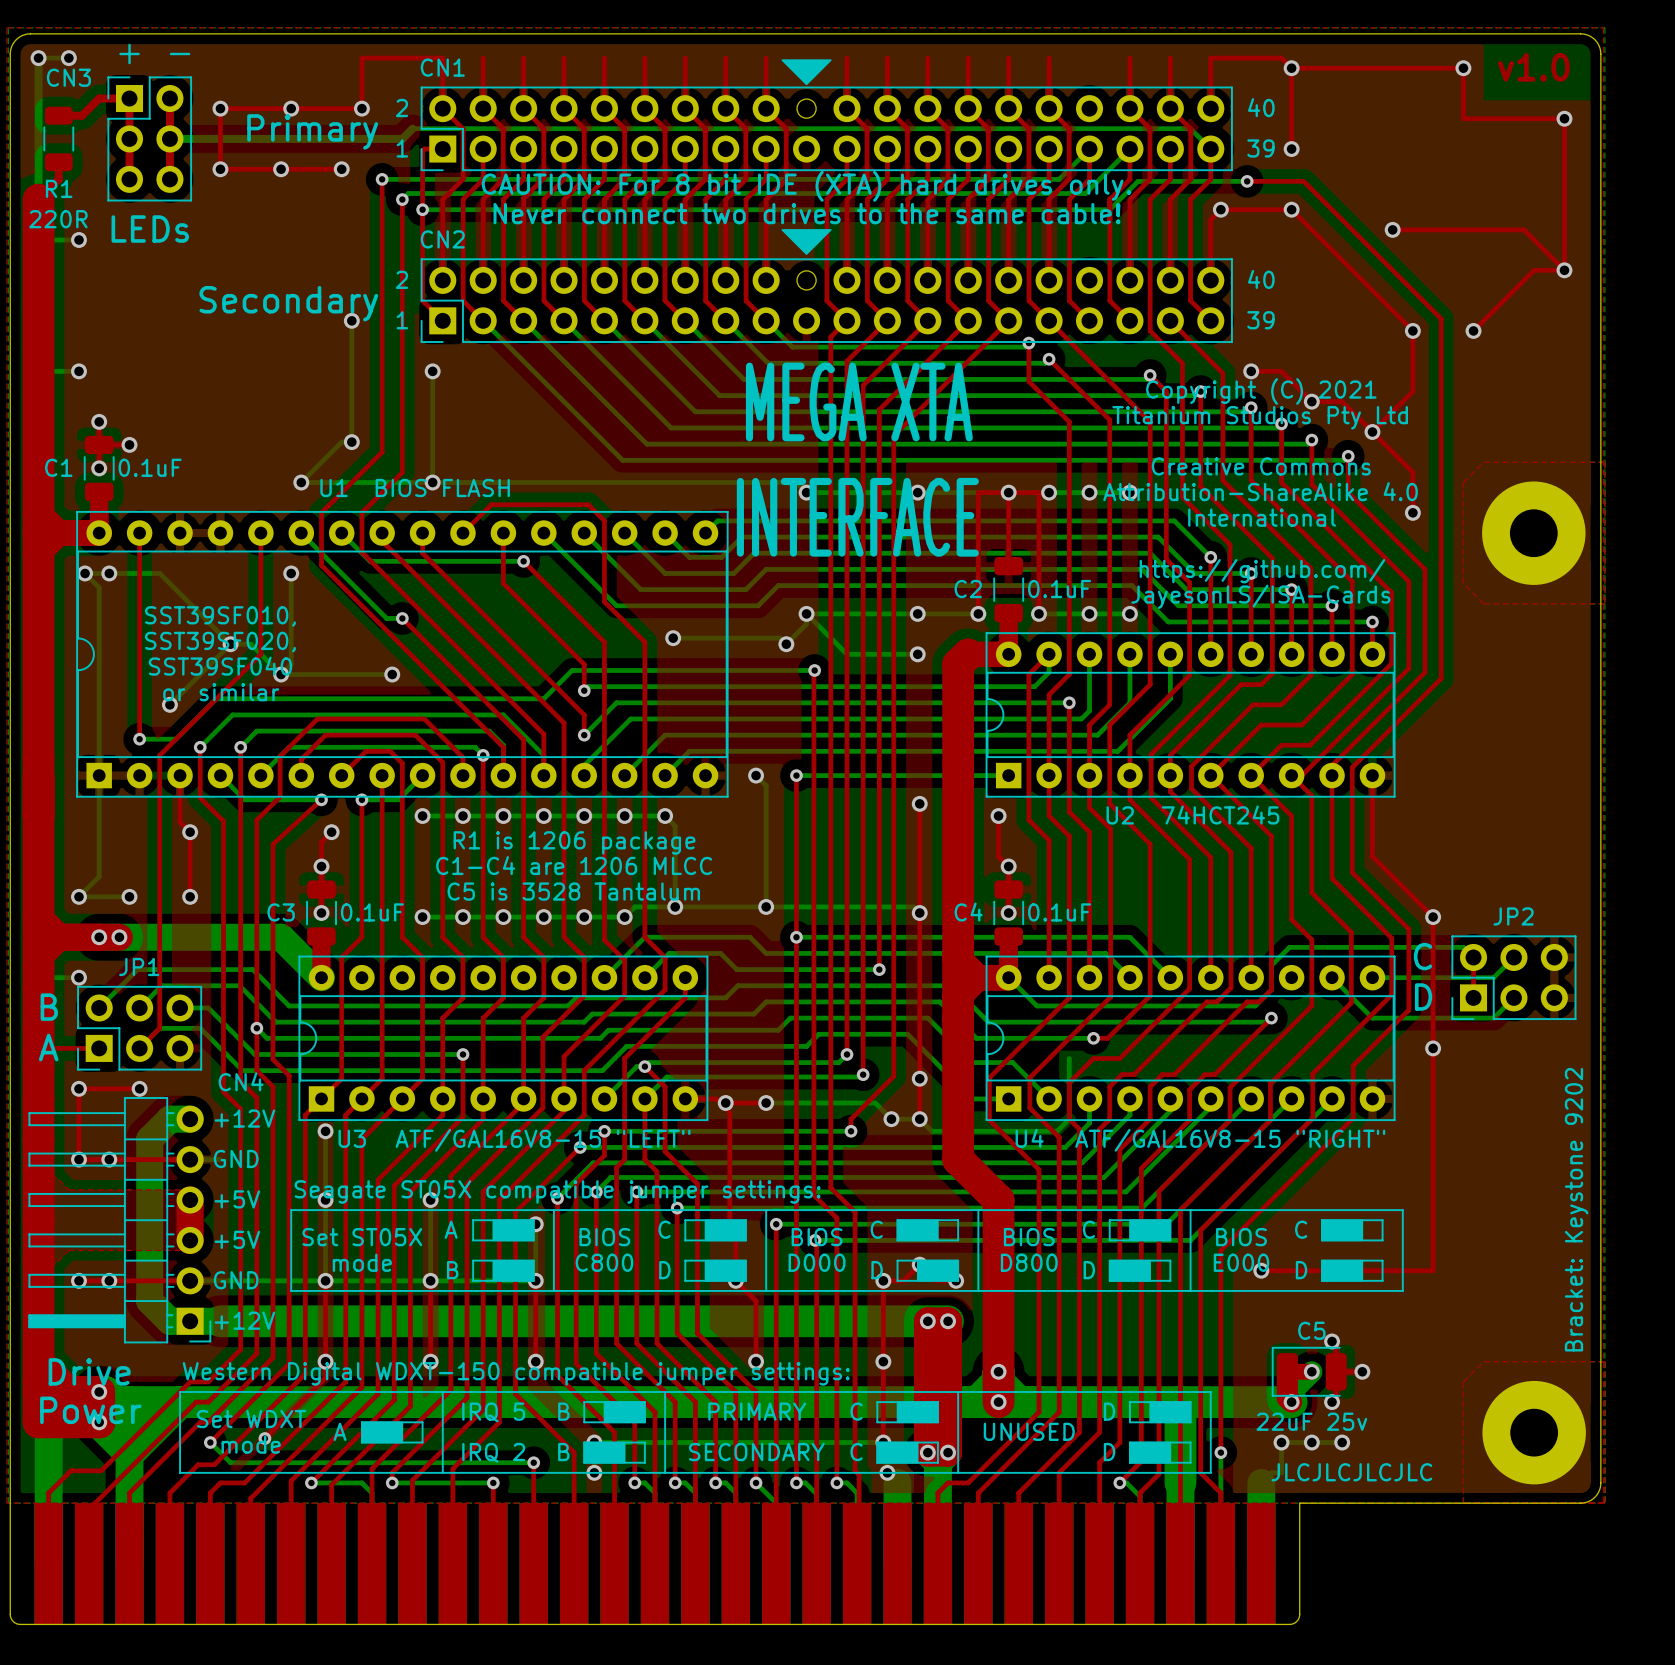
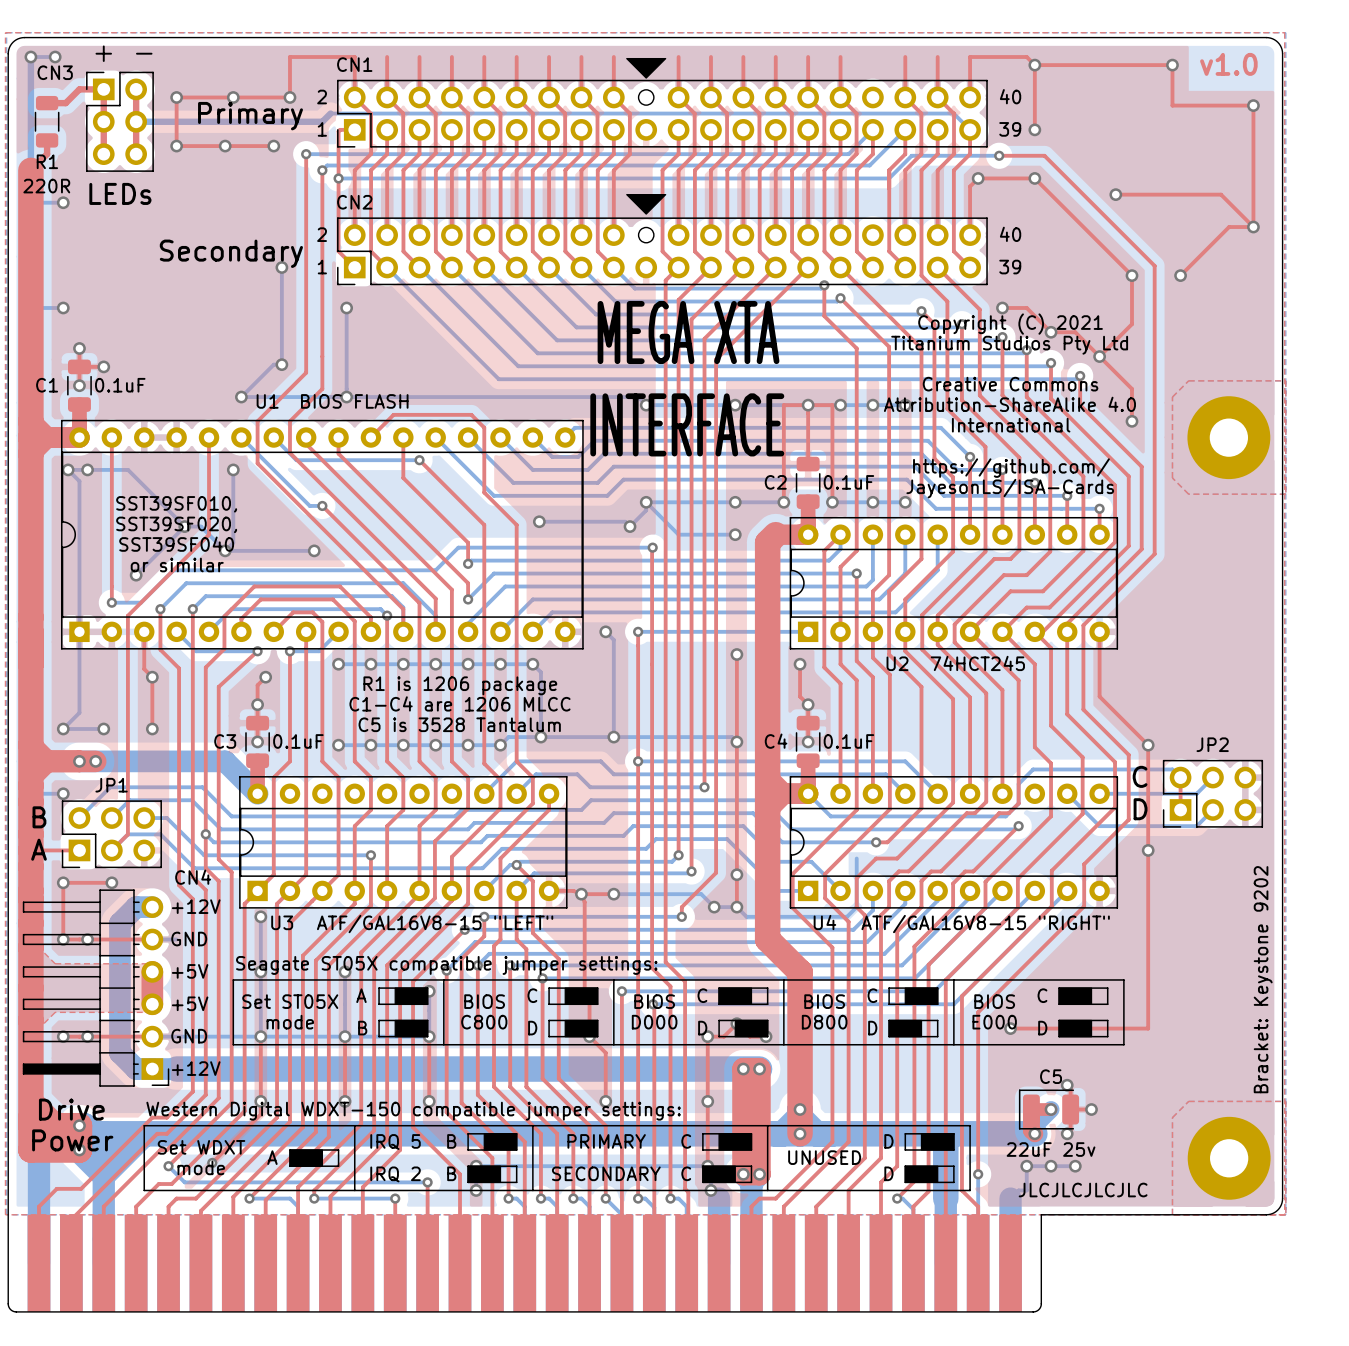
text: CAUTION: For 8 bit IDE (XTA) hard drives only. (806, 186) -> none
text: Never connect two drives to the same cable! (807, 213) -> none

